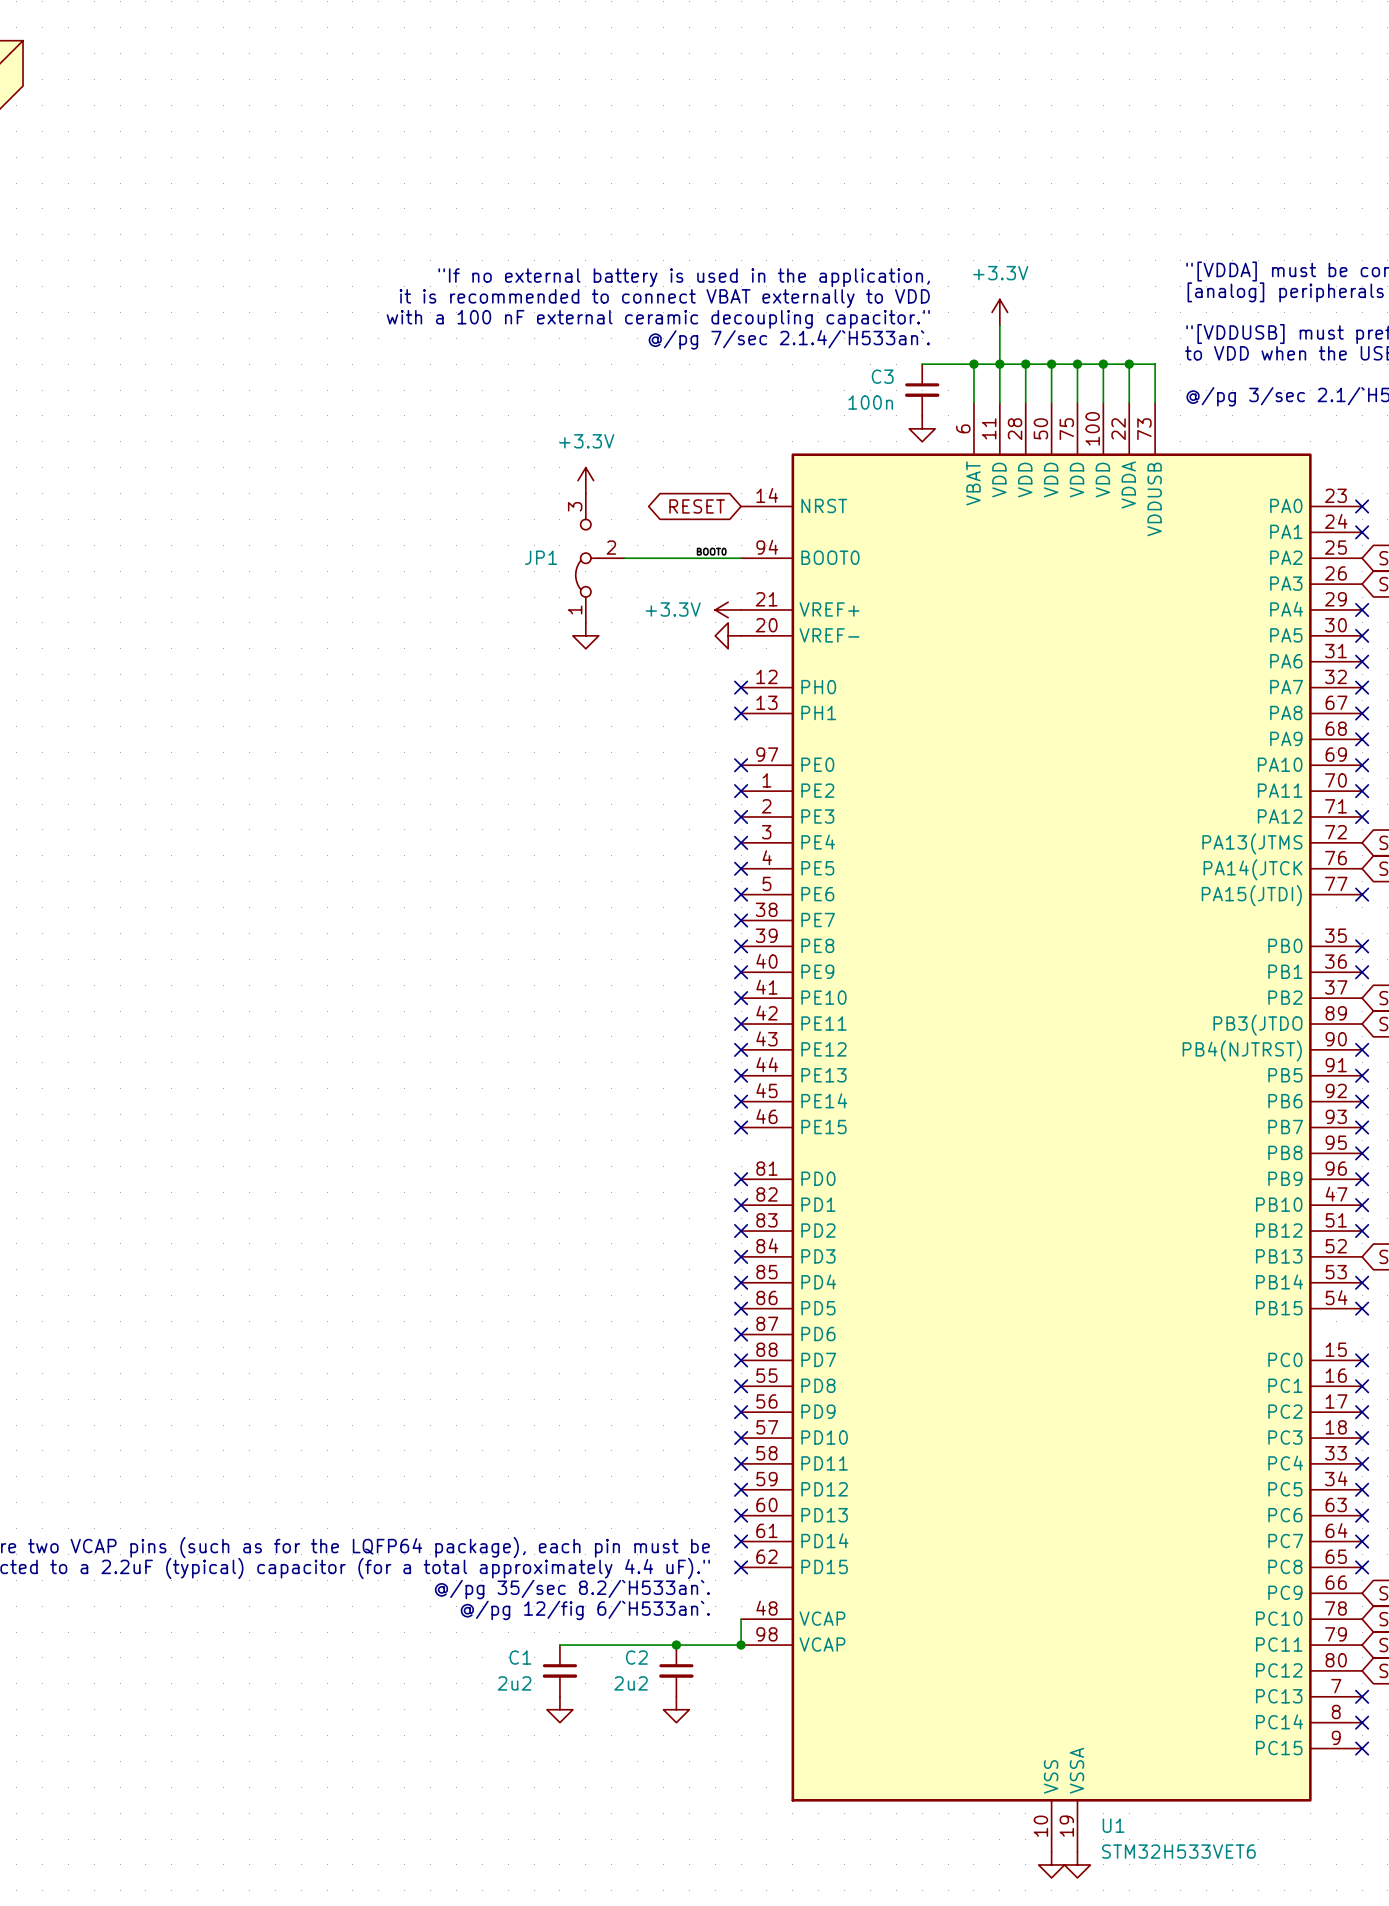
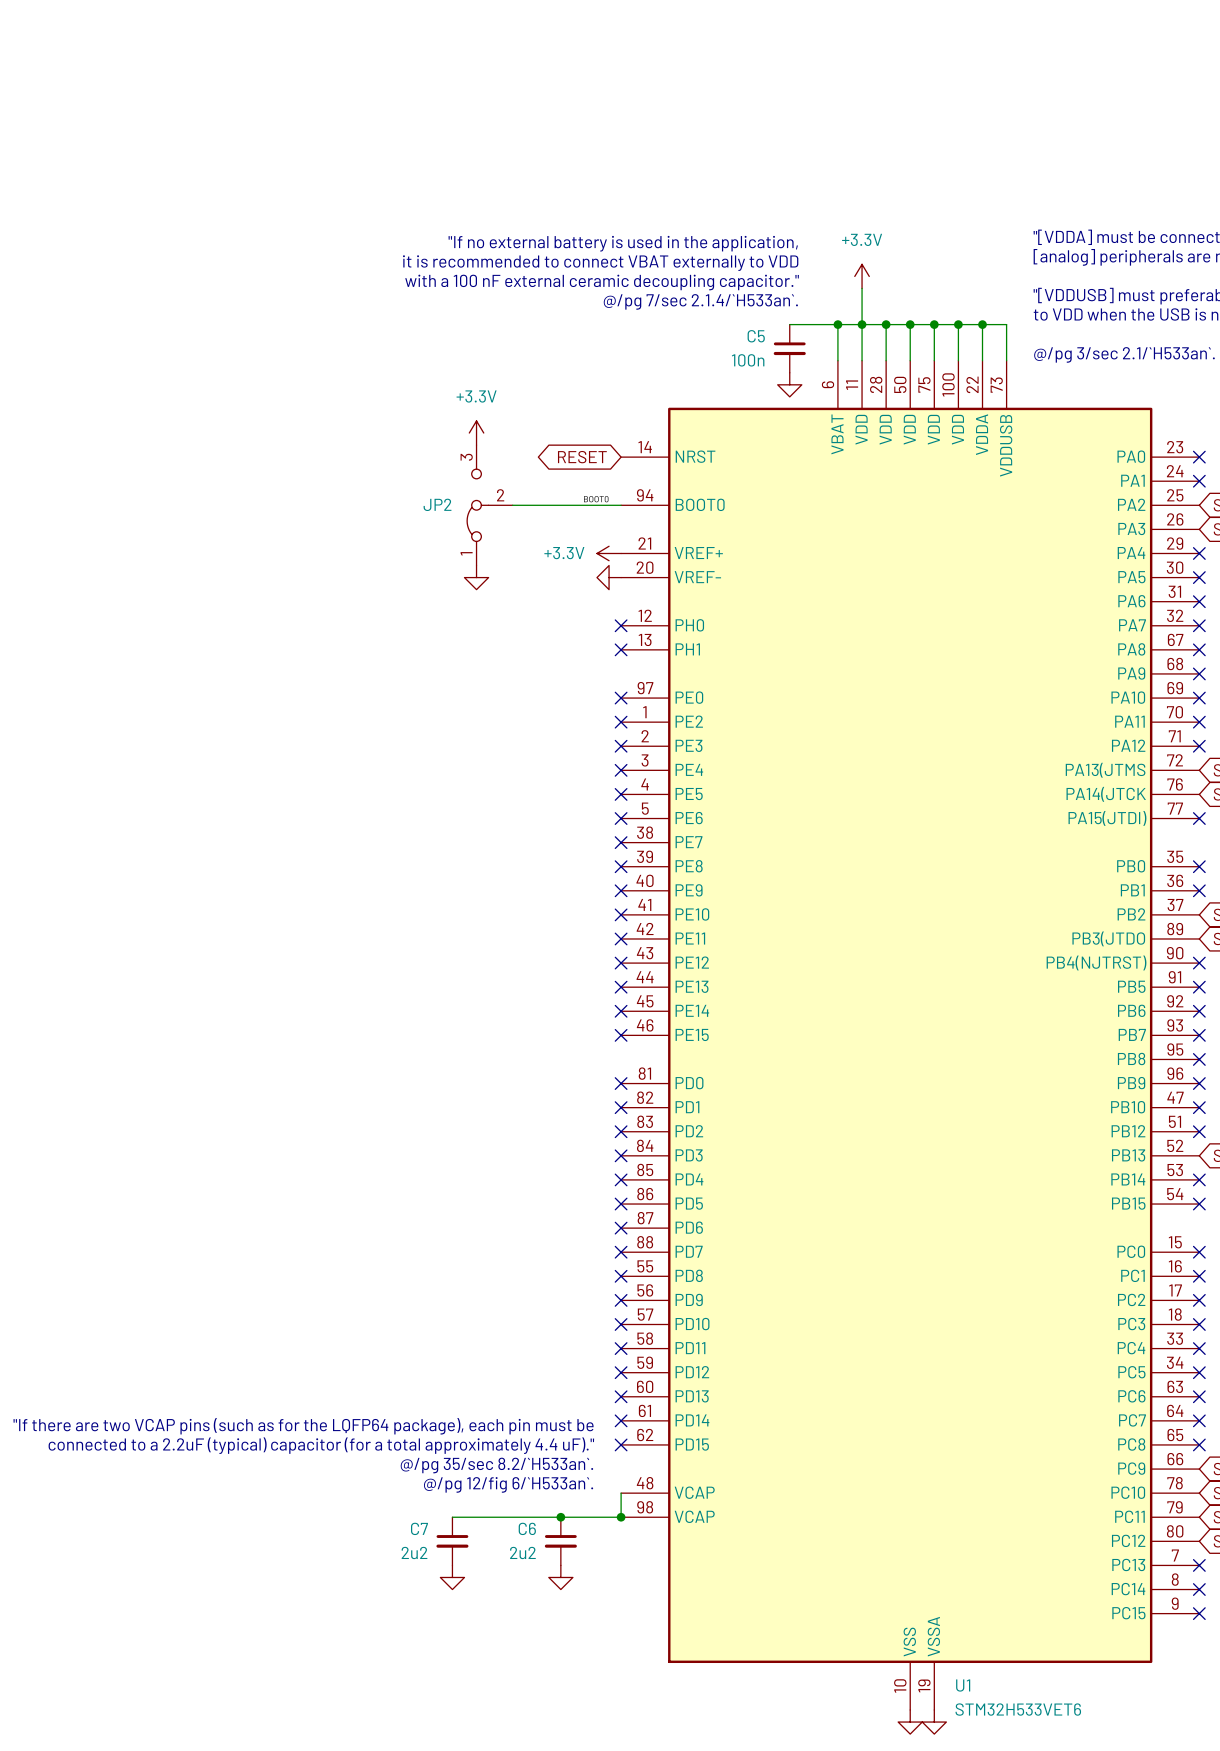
C3 name: C3 (882, 376) -> C5 (756, 336)
JP1 name: JP1 (541, 557) -> JP2 (437, 504)
C1 name: C1 (520, 1657) -> C7 (419, 1528)
C2 name: C2 (636, 1657) -> C6 (527, 1528)

